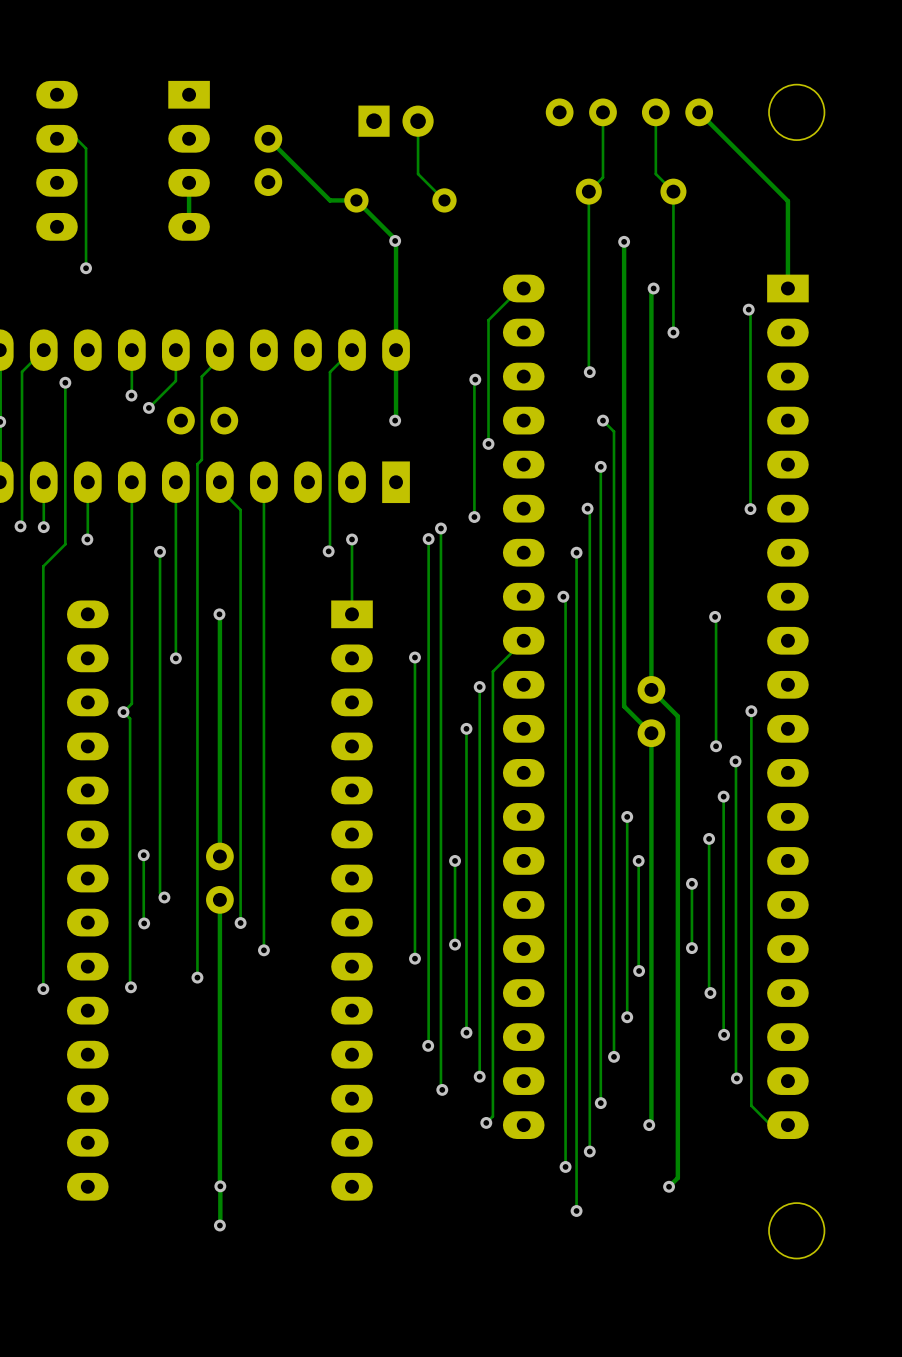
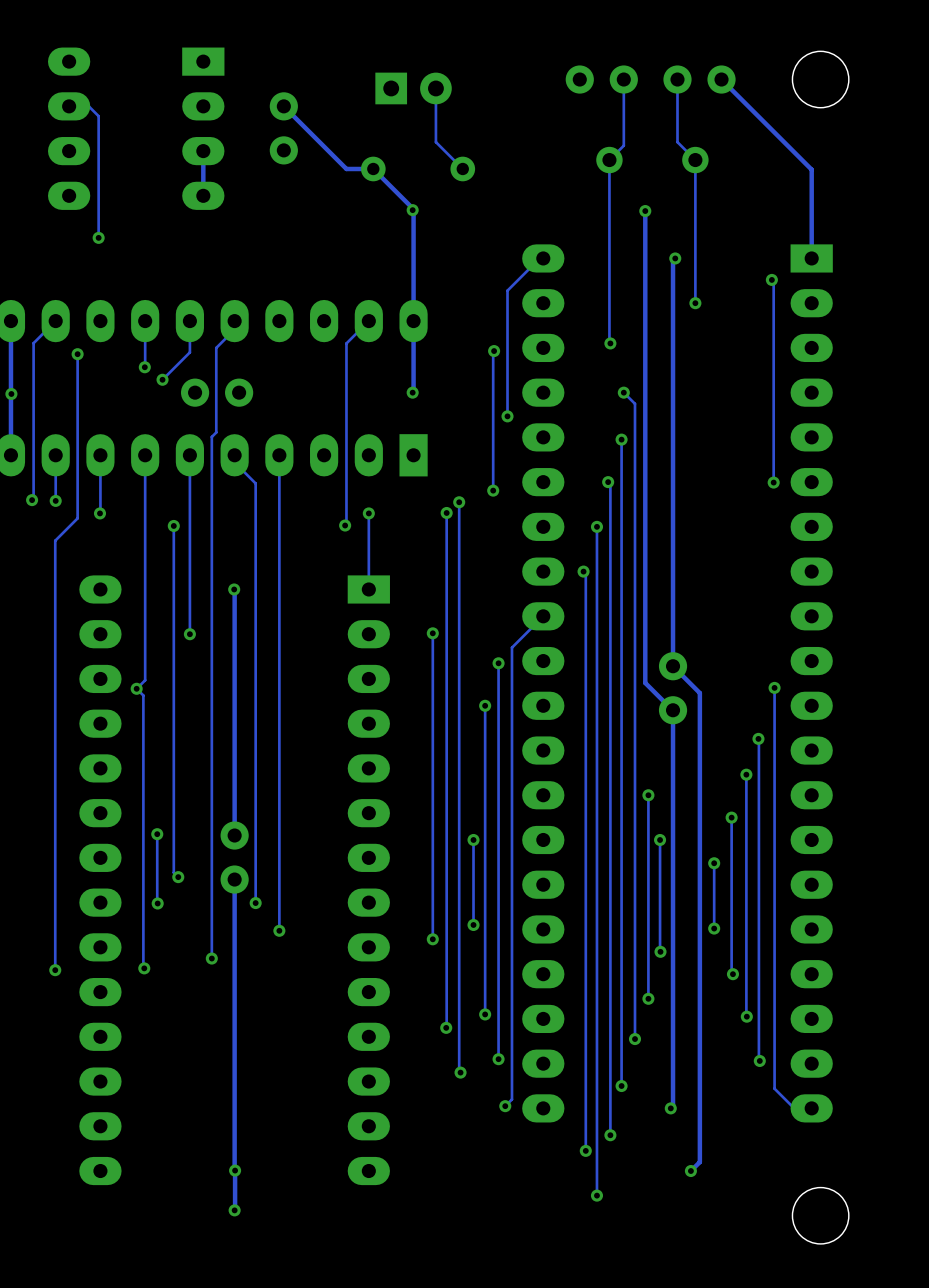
track: (715, 616) (716, 746) -> none
via: (715, 616) -> none
via: (716, 746) -> none

